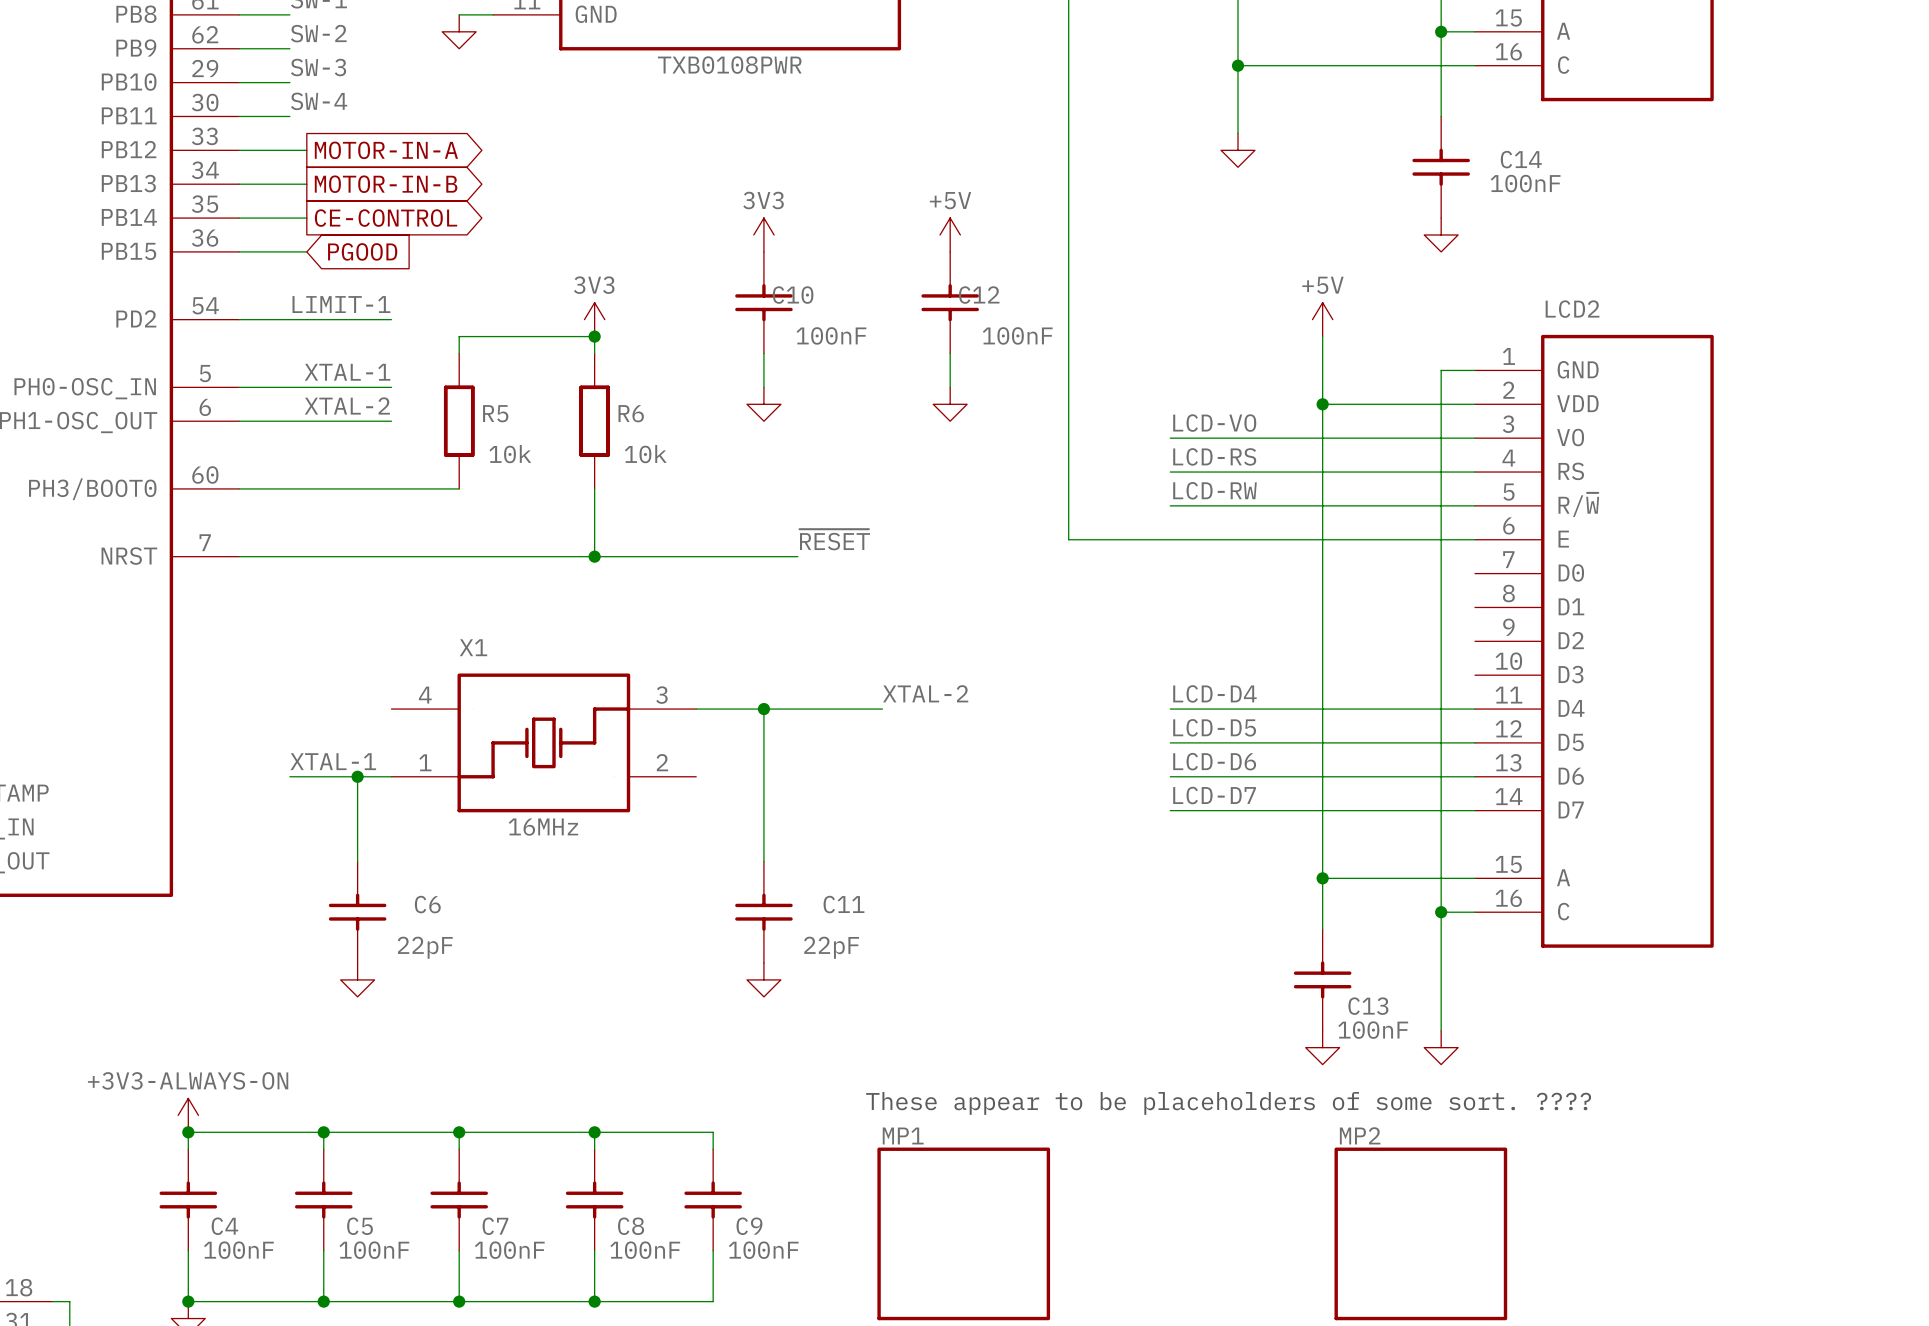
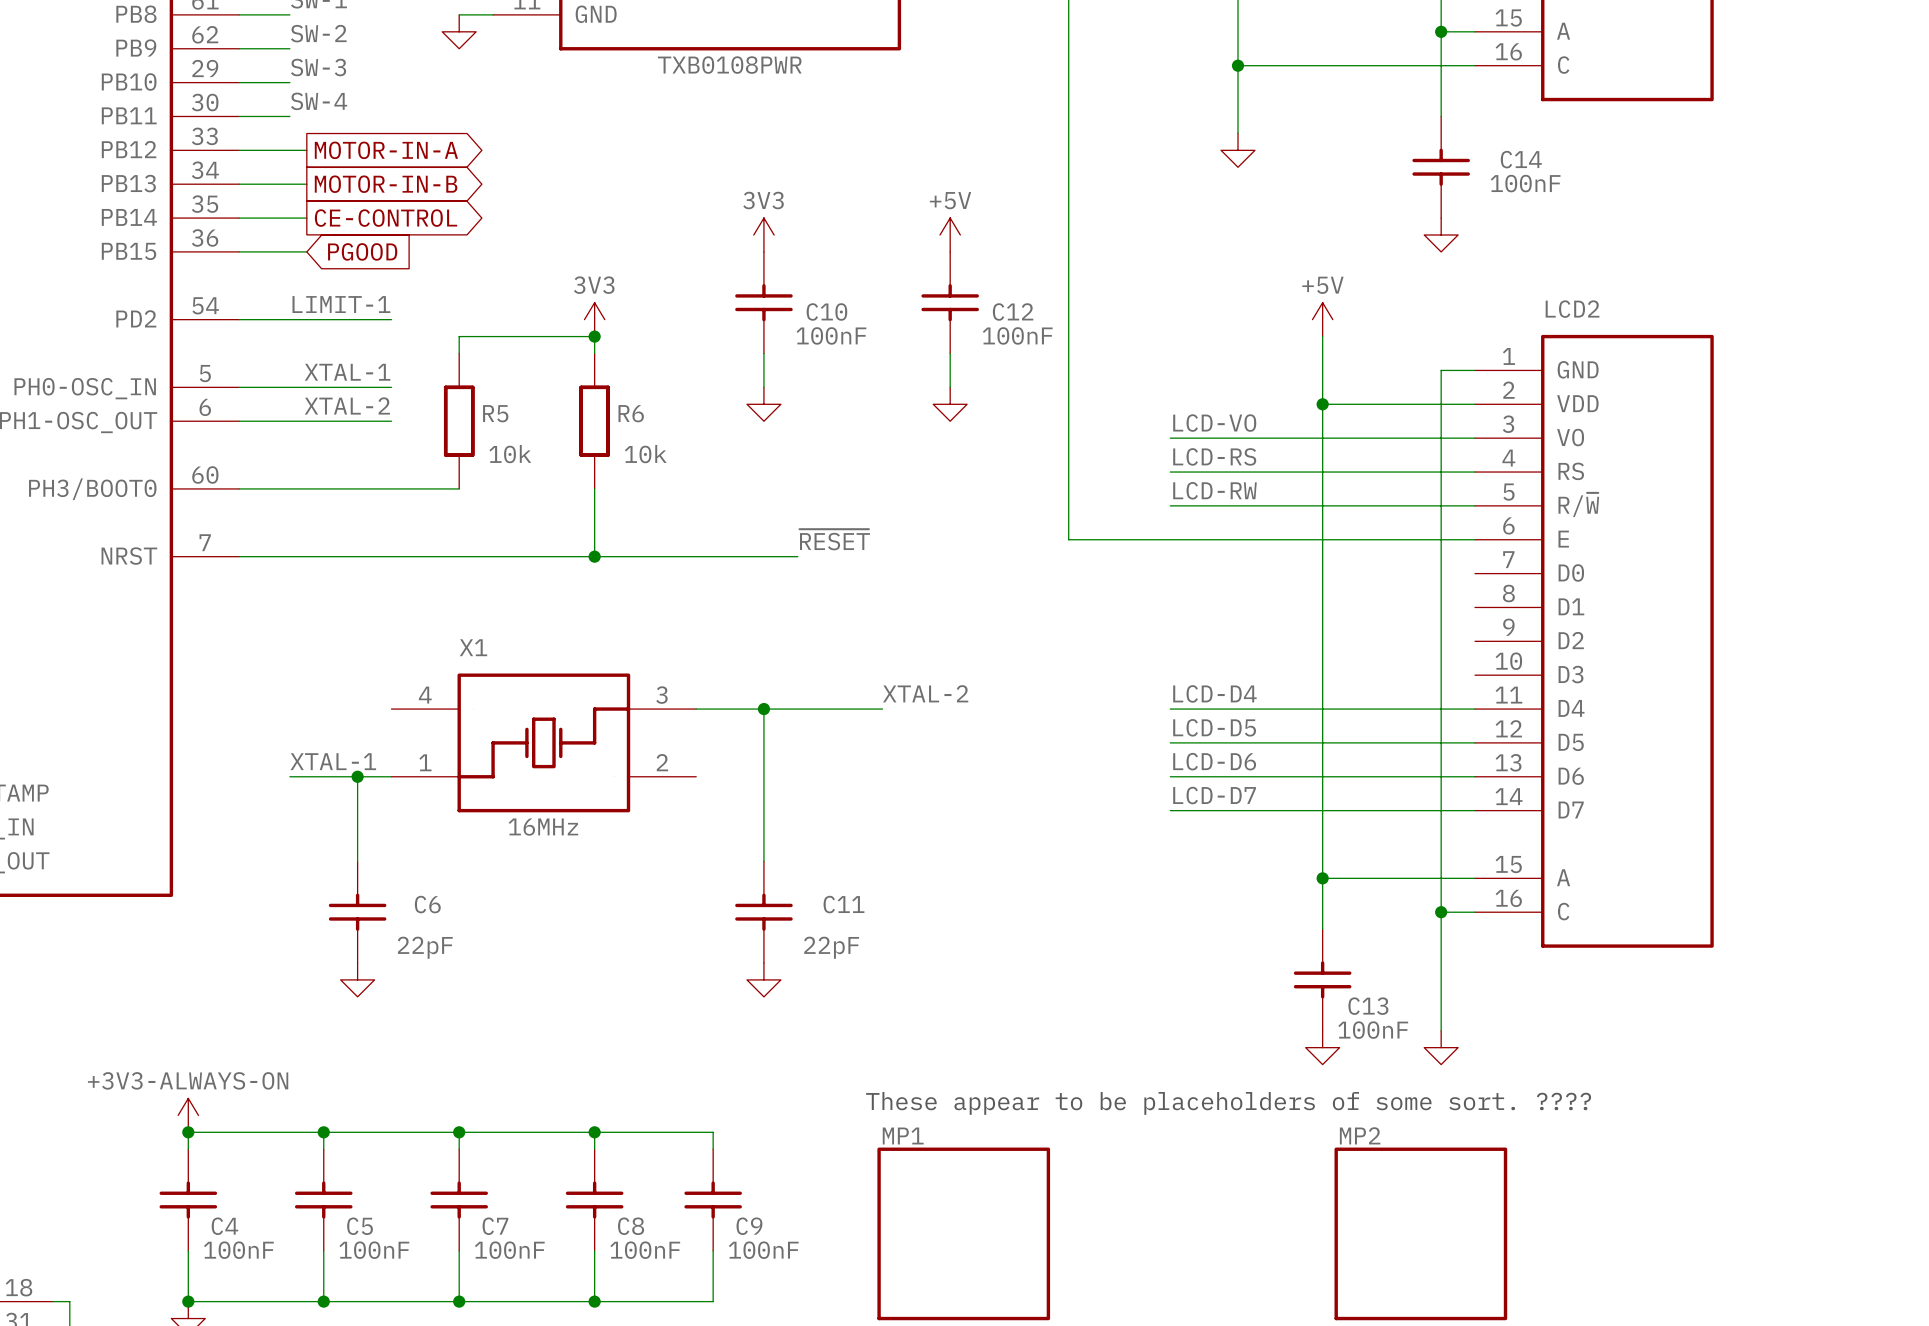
C10 name position: C10 (793, 295) -> C10 (826, 311)
C12 name position: C12 (979, 295) -> C12 (1013, 311)

